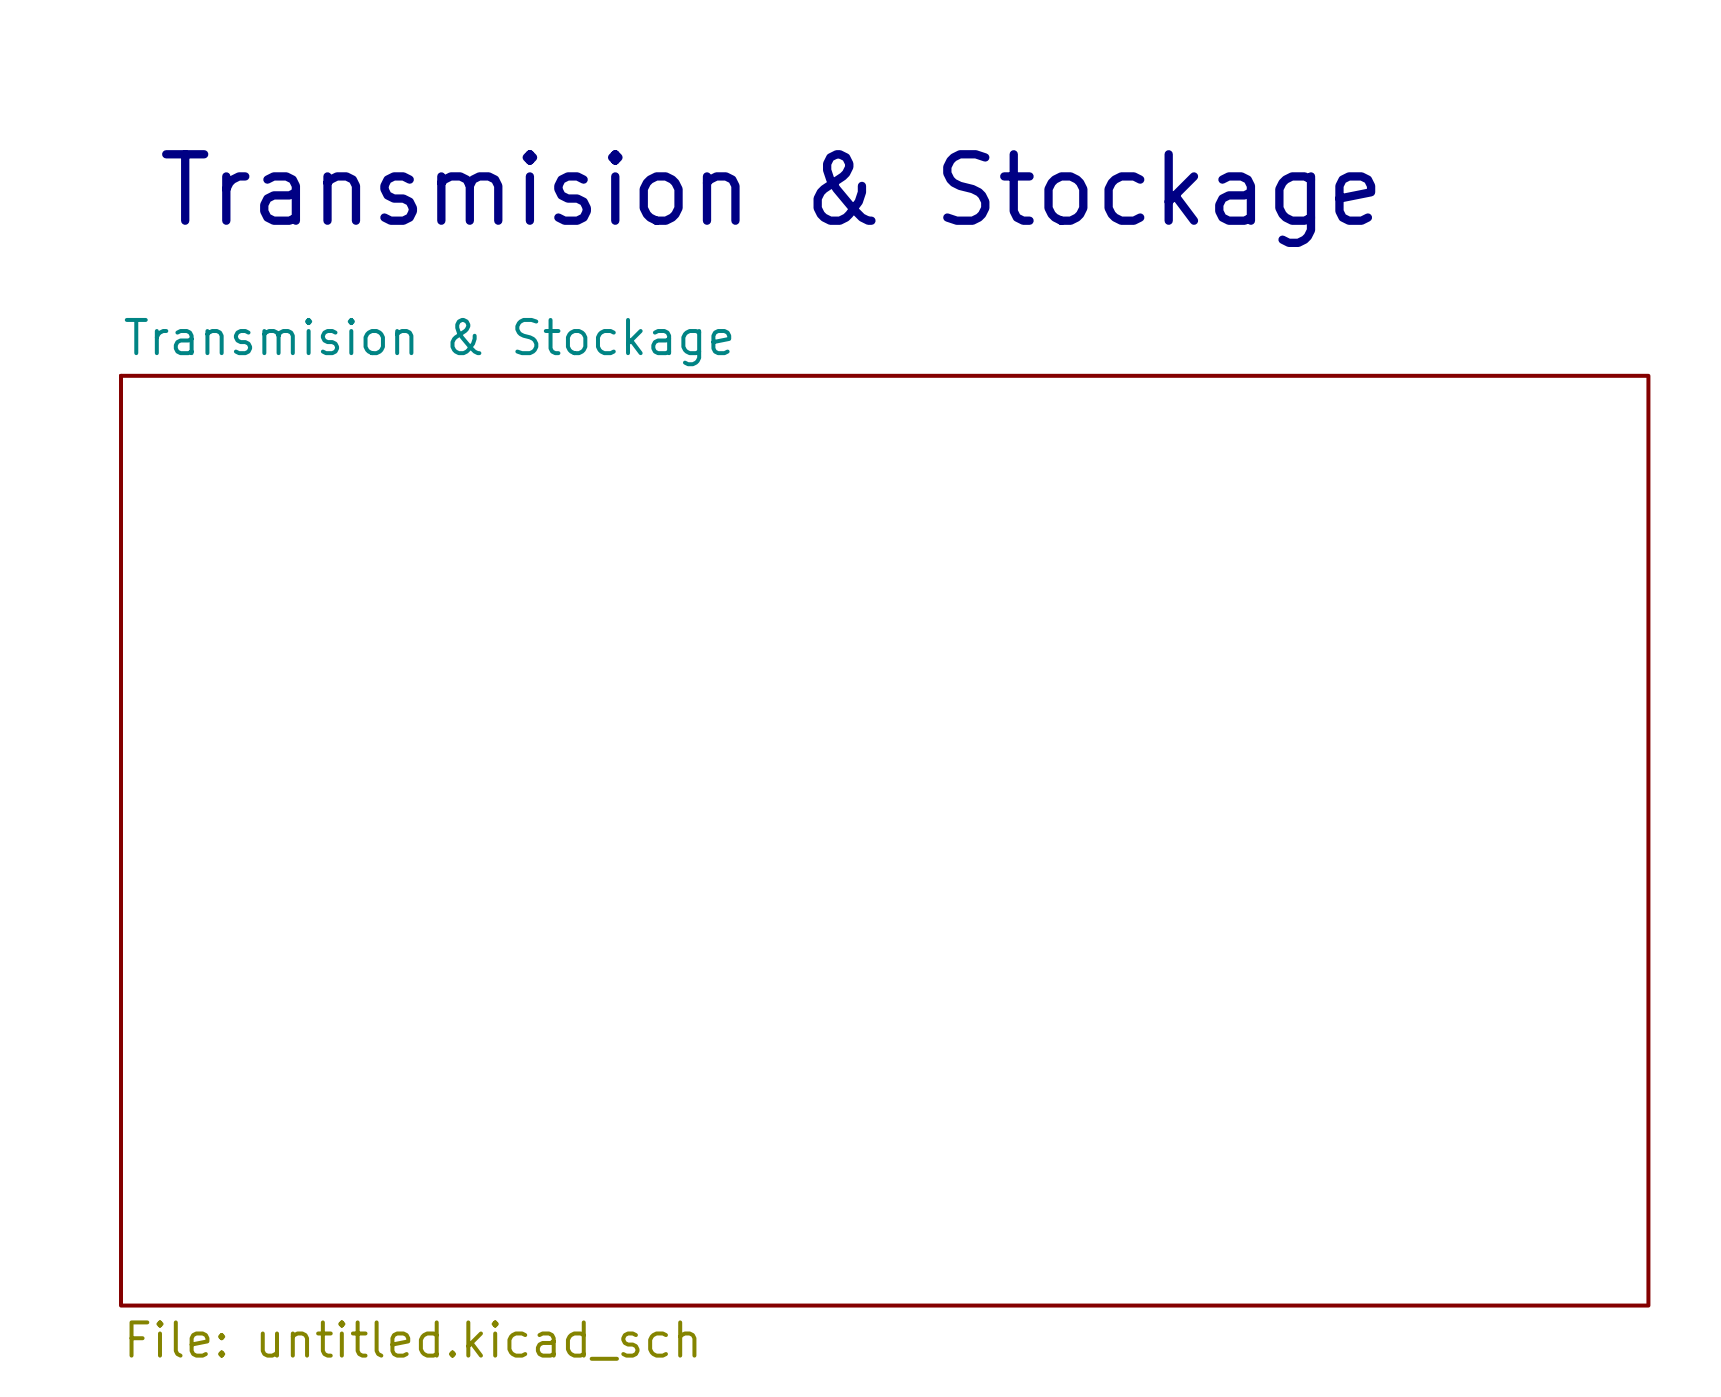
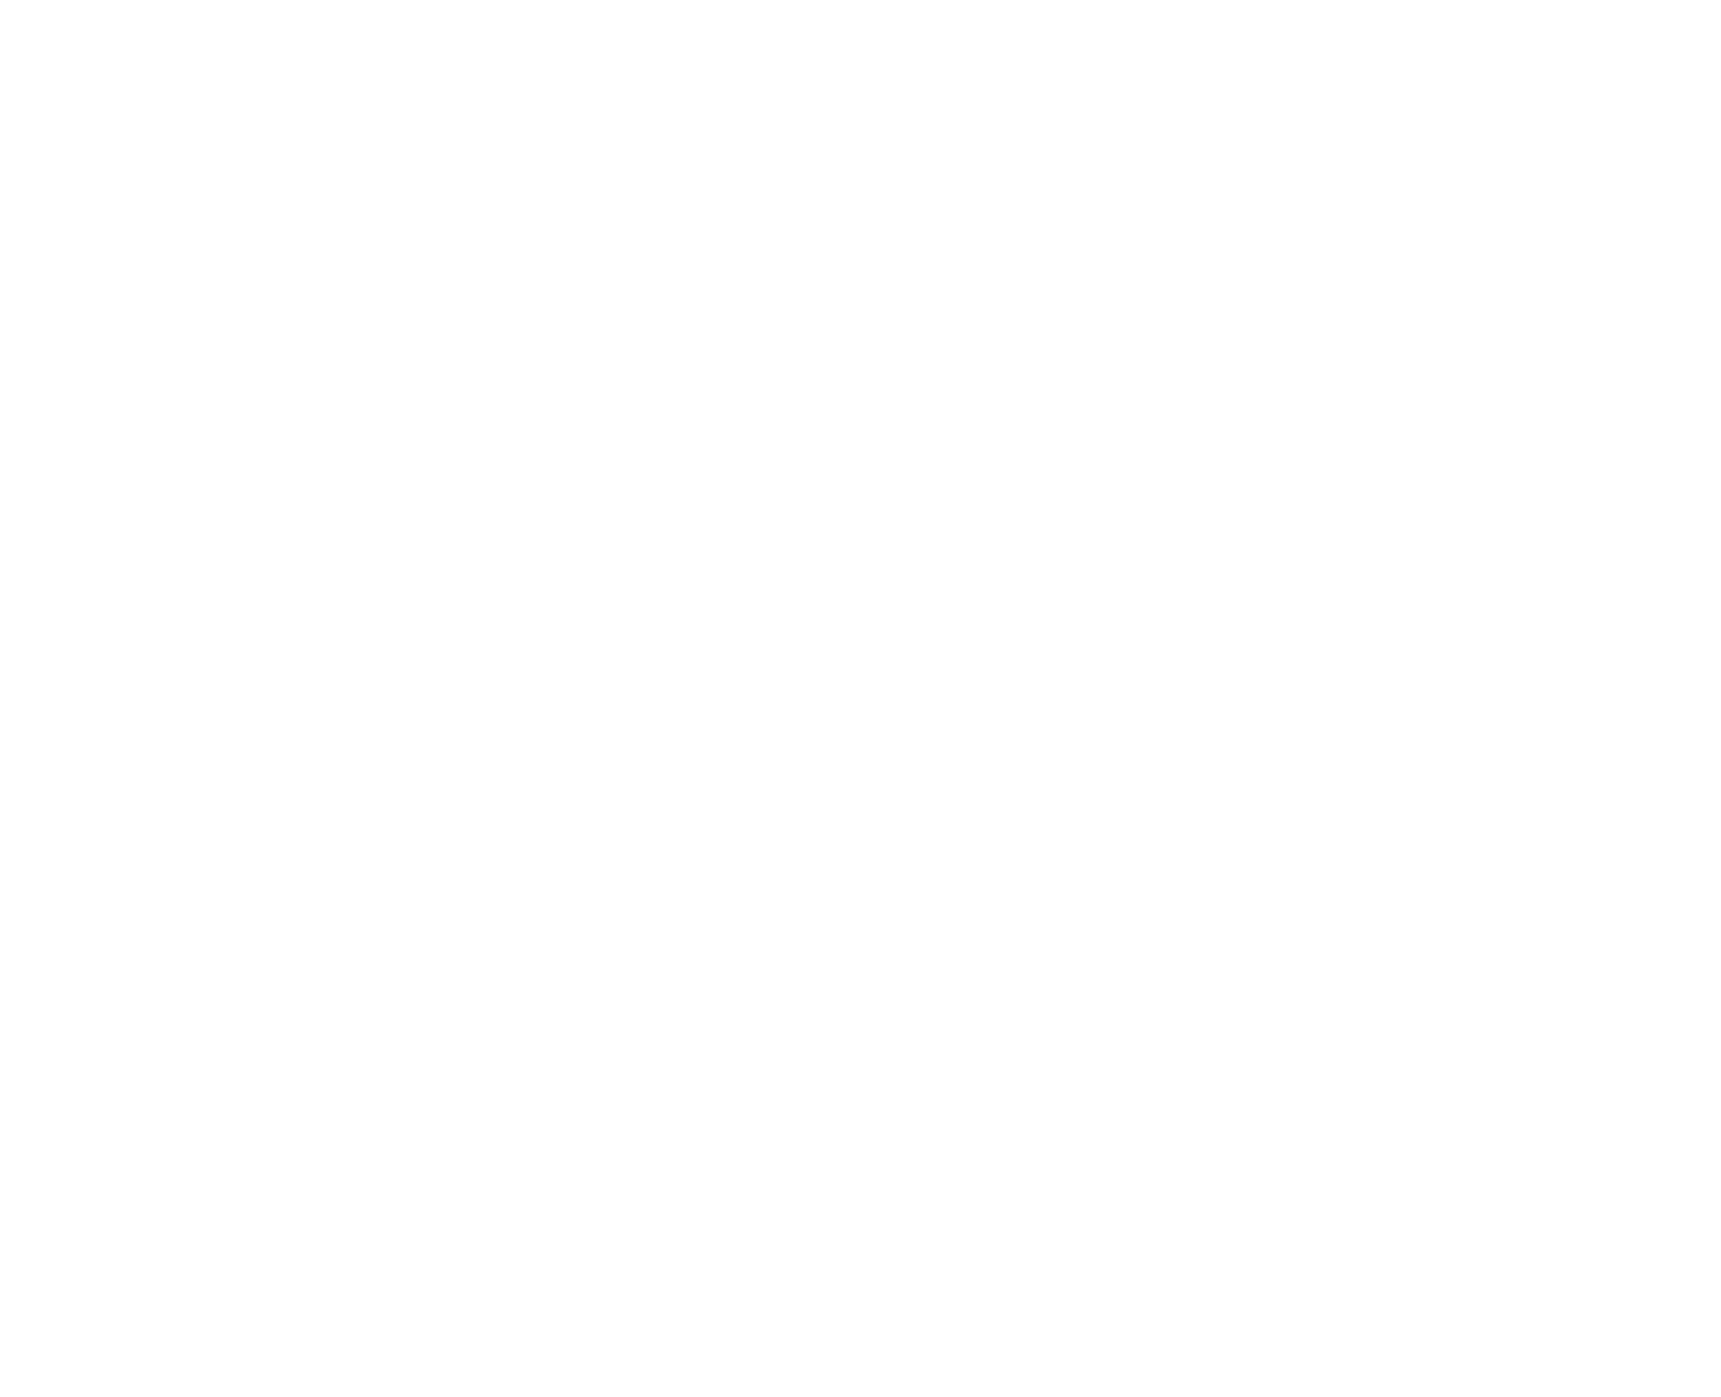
text: Transmision & Stockage (768, 198) -> none
sheet Transmision & Stockage: File: untitled.kicad_sch (884, 840) -> none

